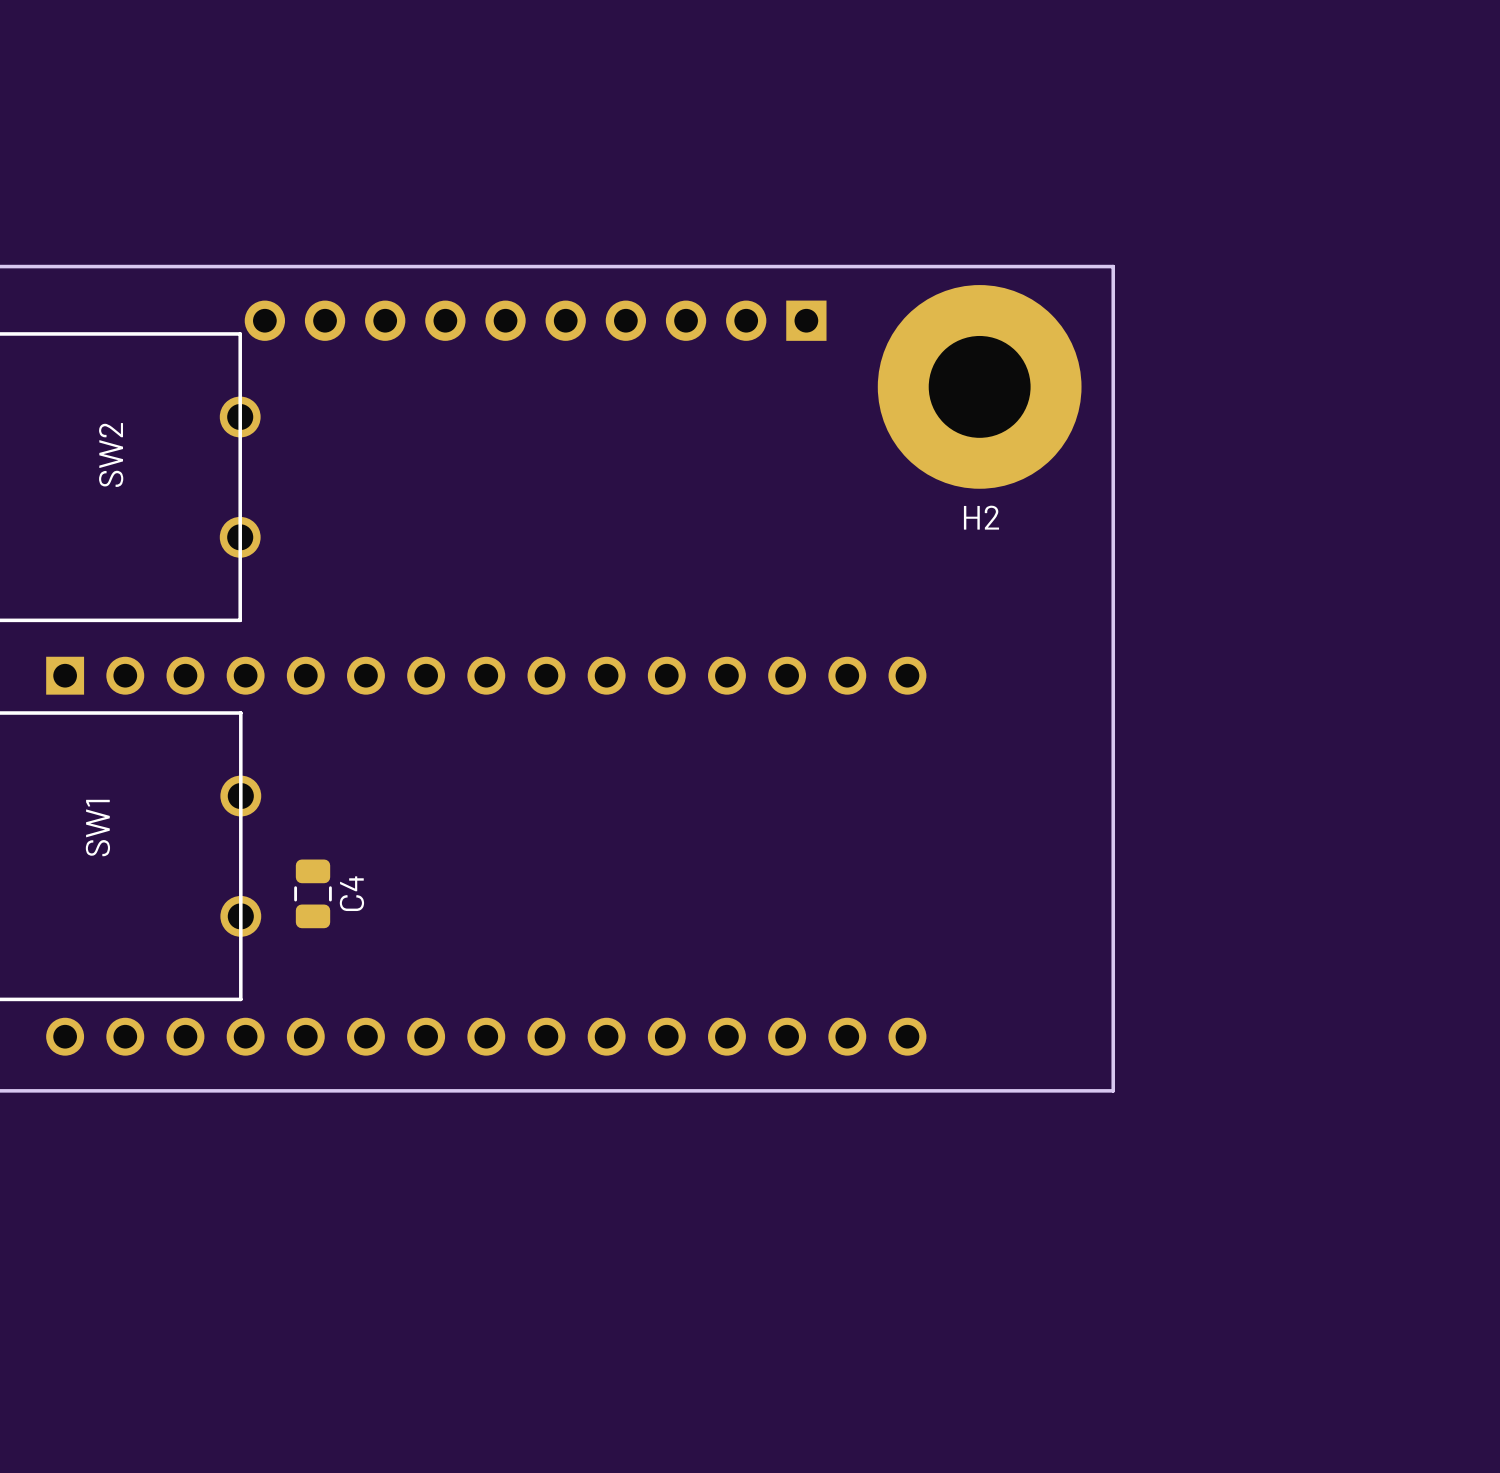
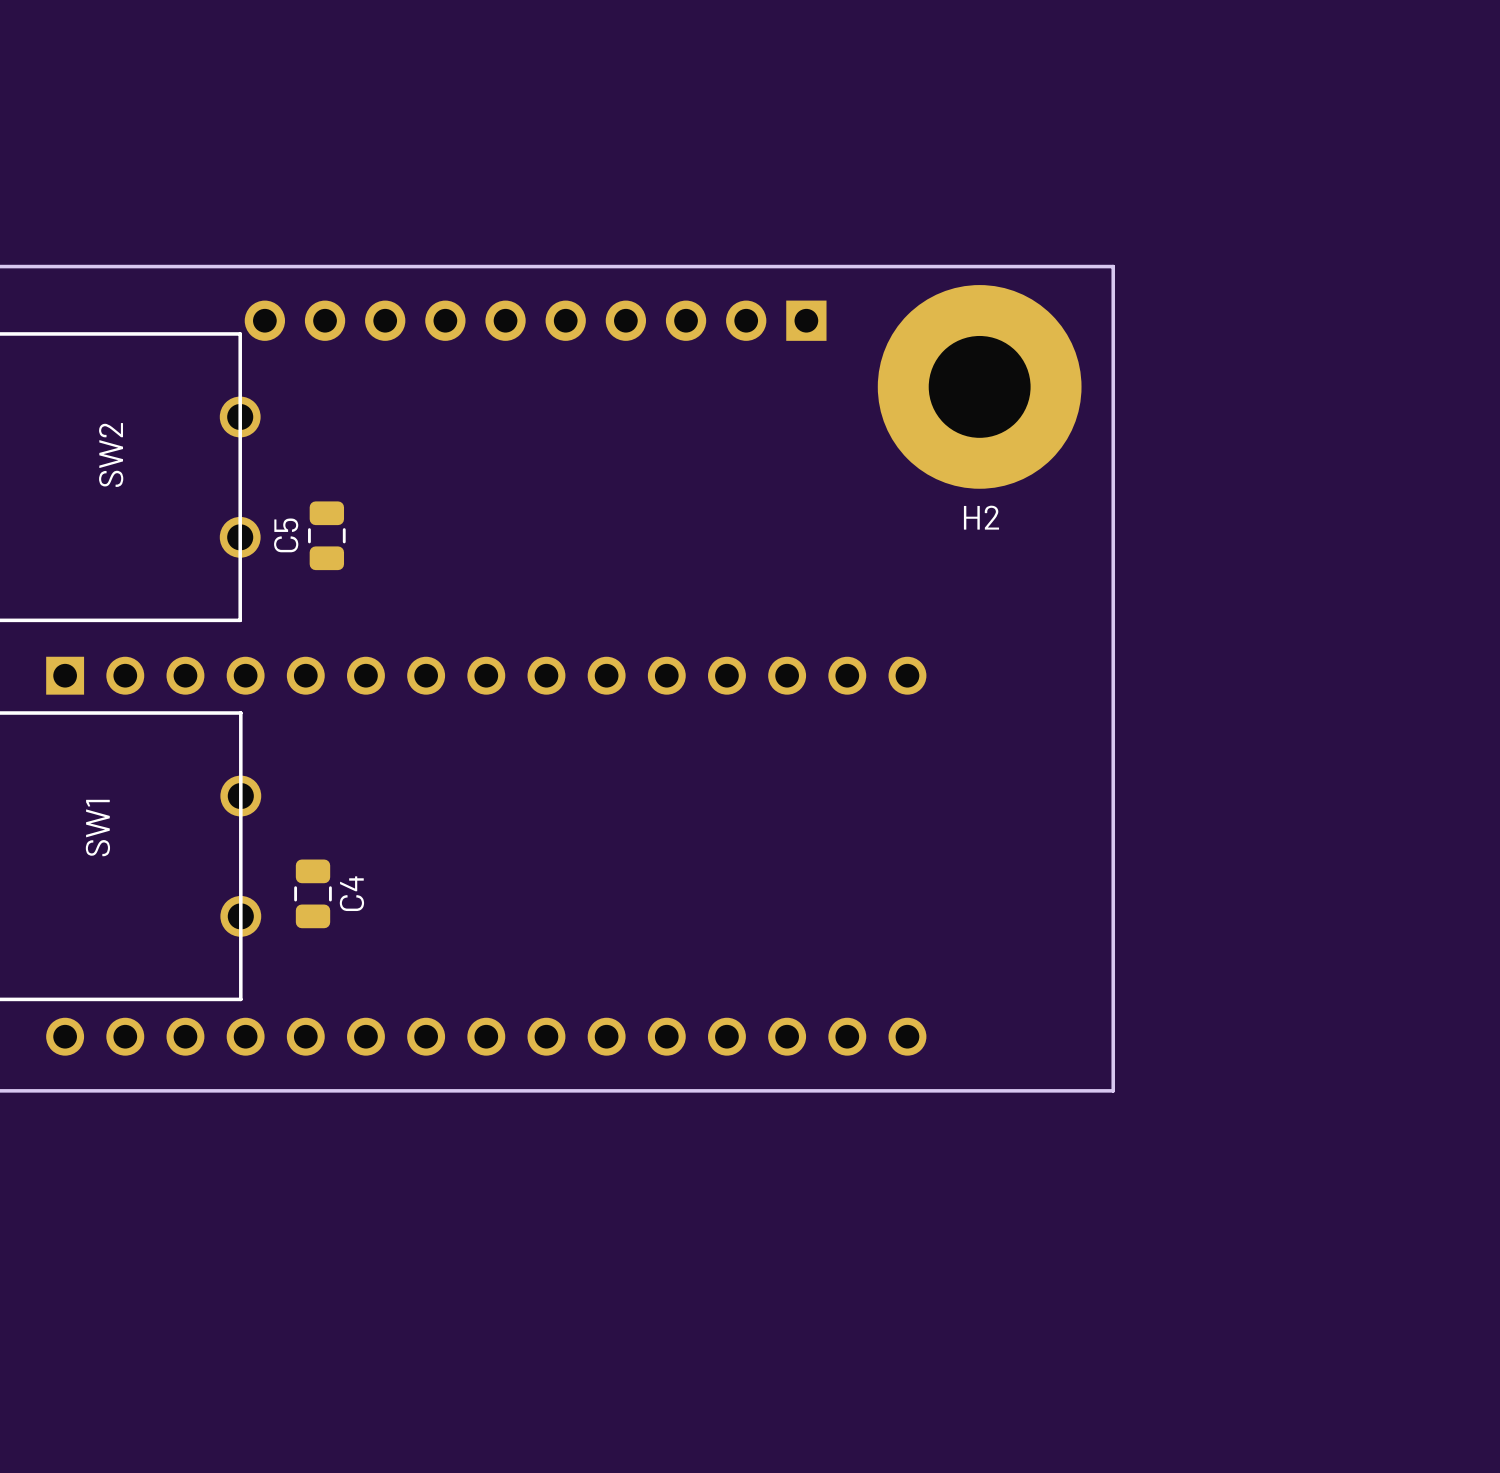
C5: none -> (326, 535)

